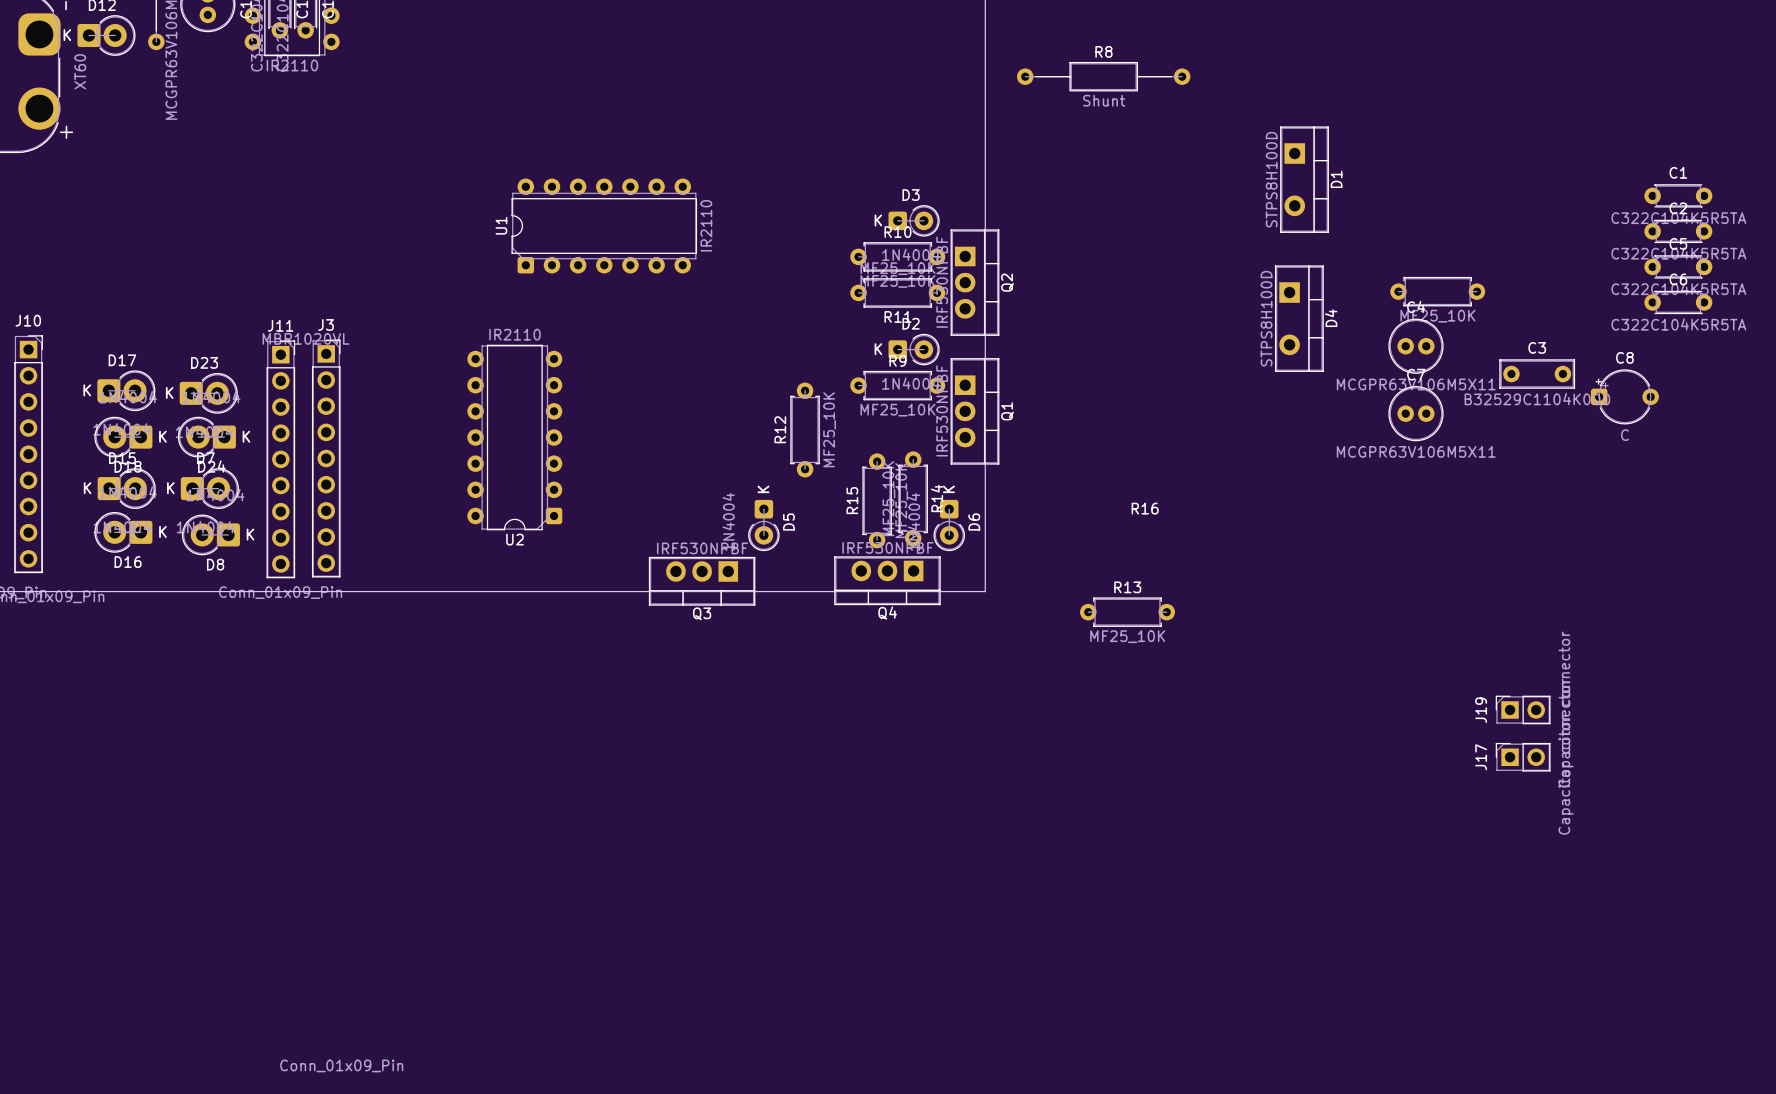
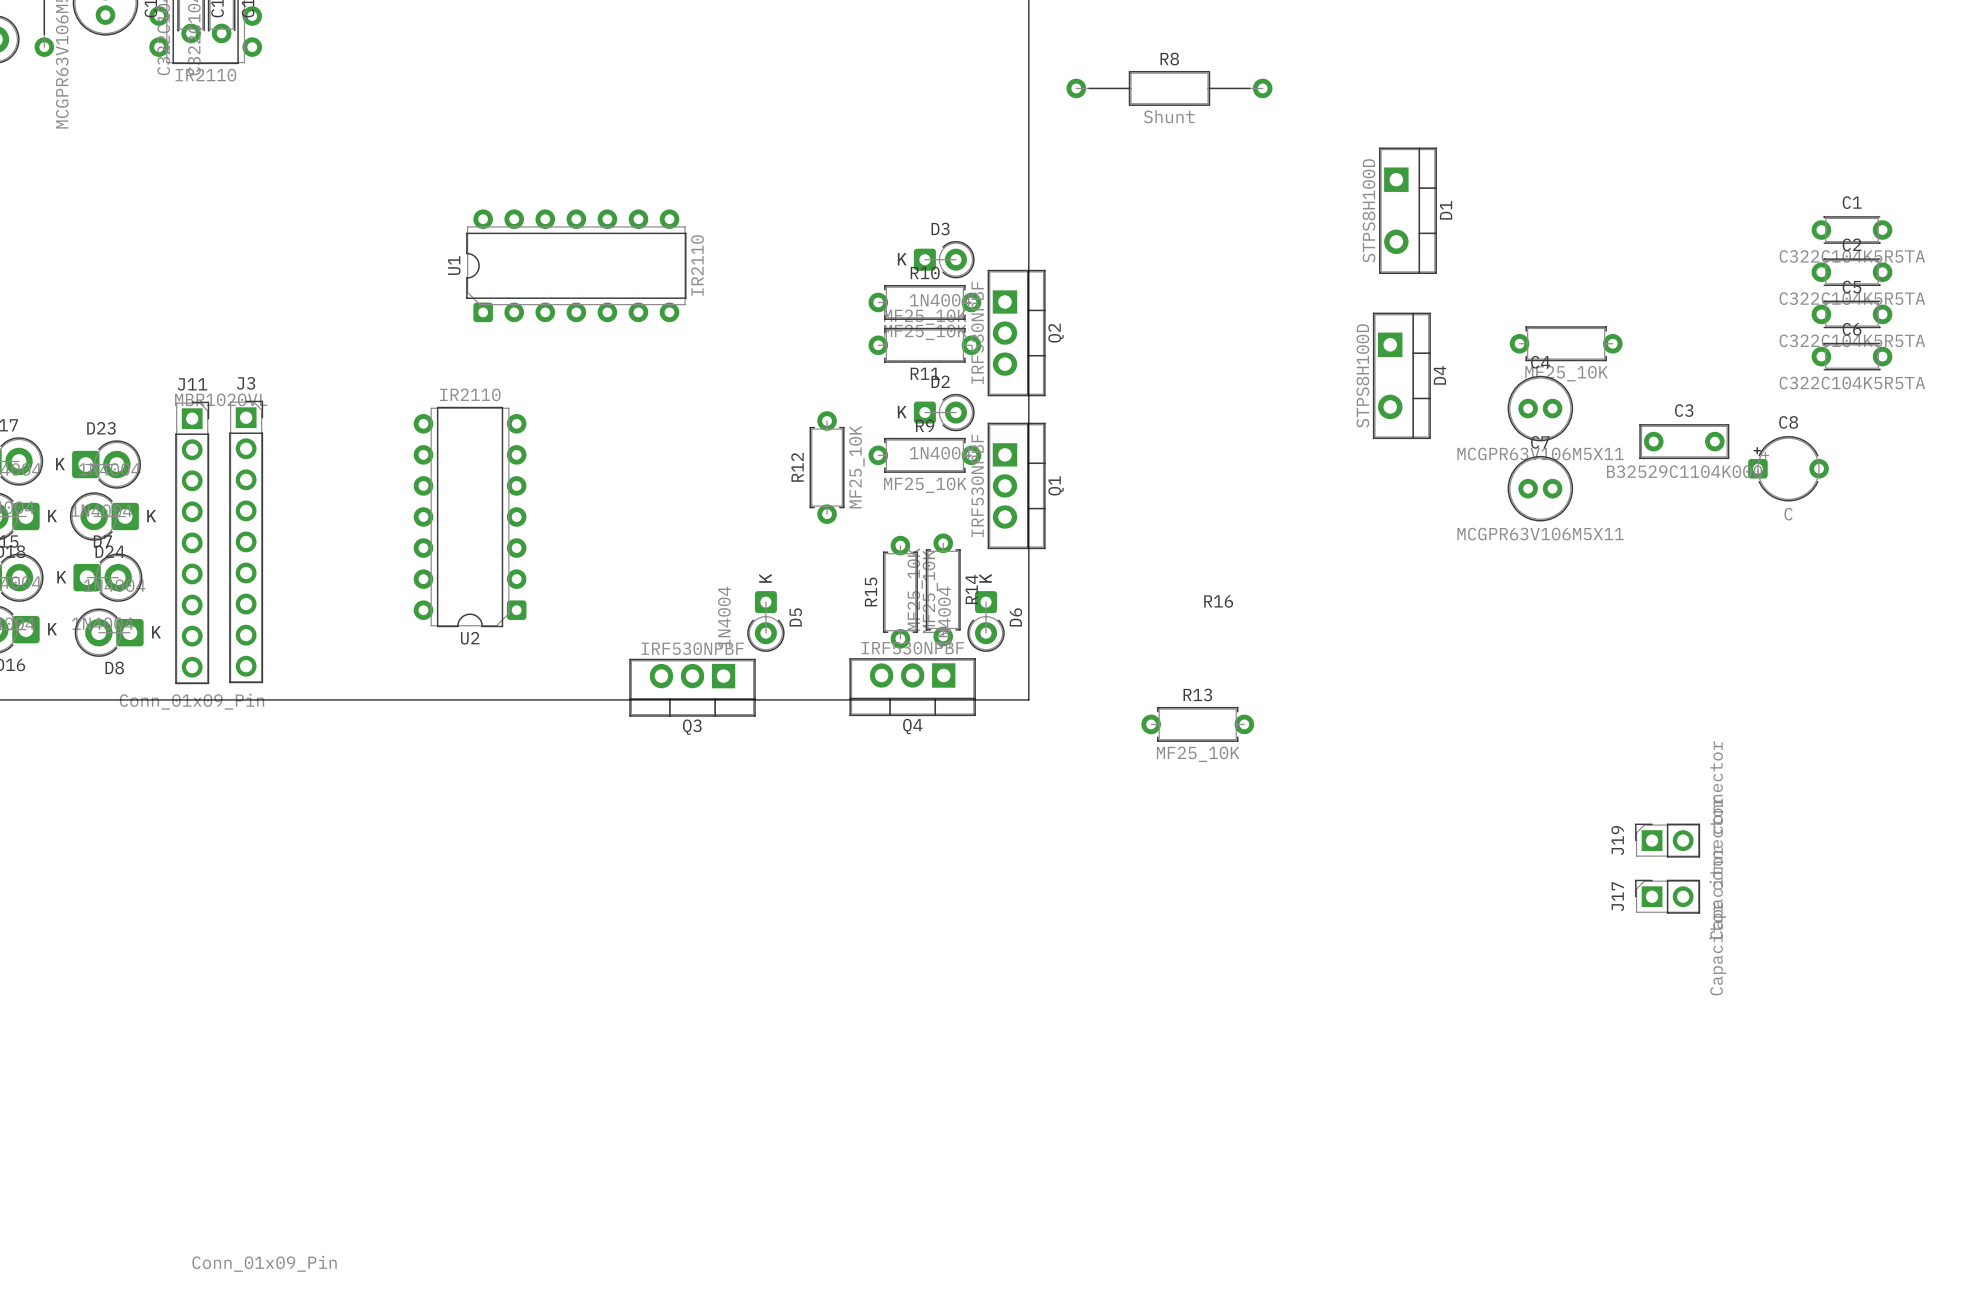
R12 position: (805, 430) -> (827, 467)

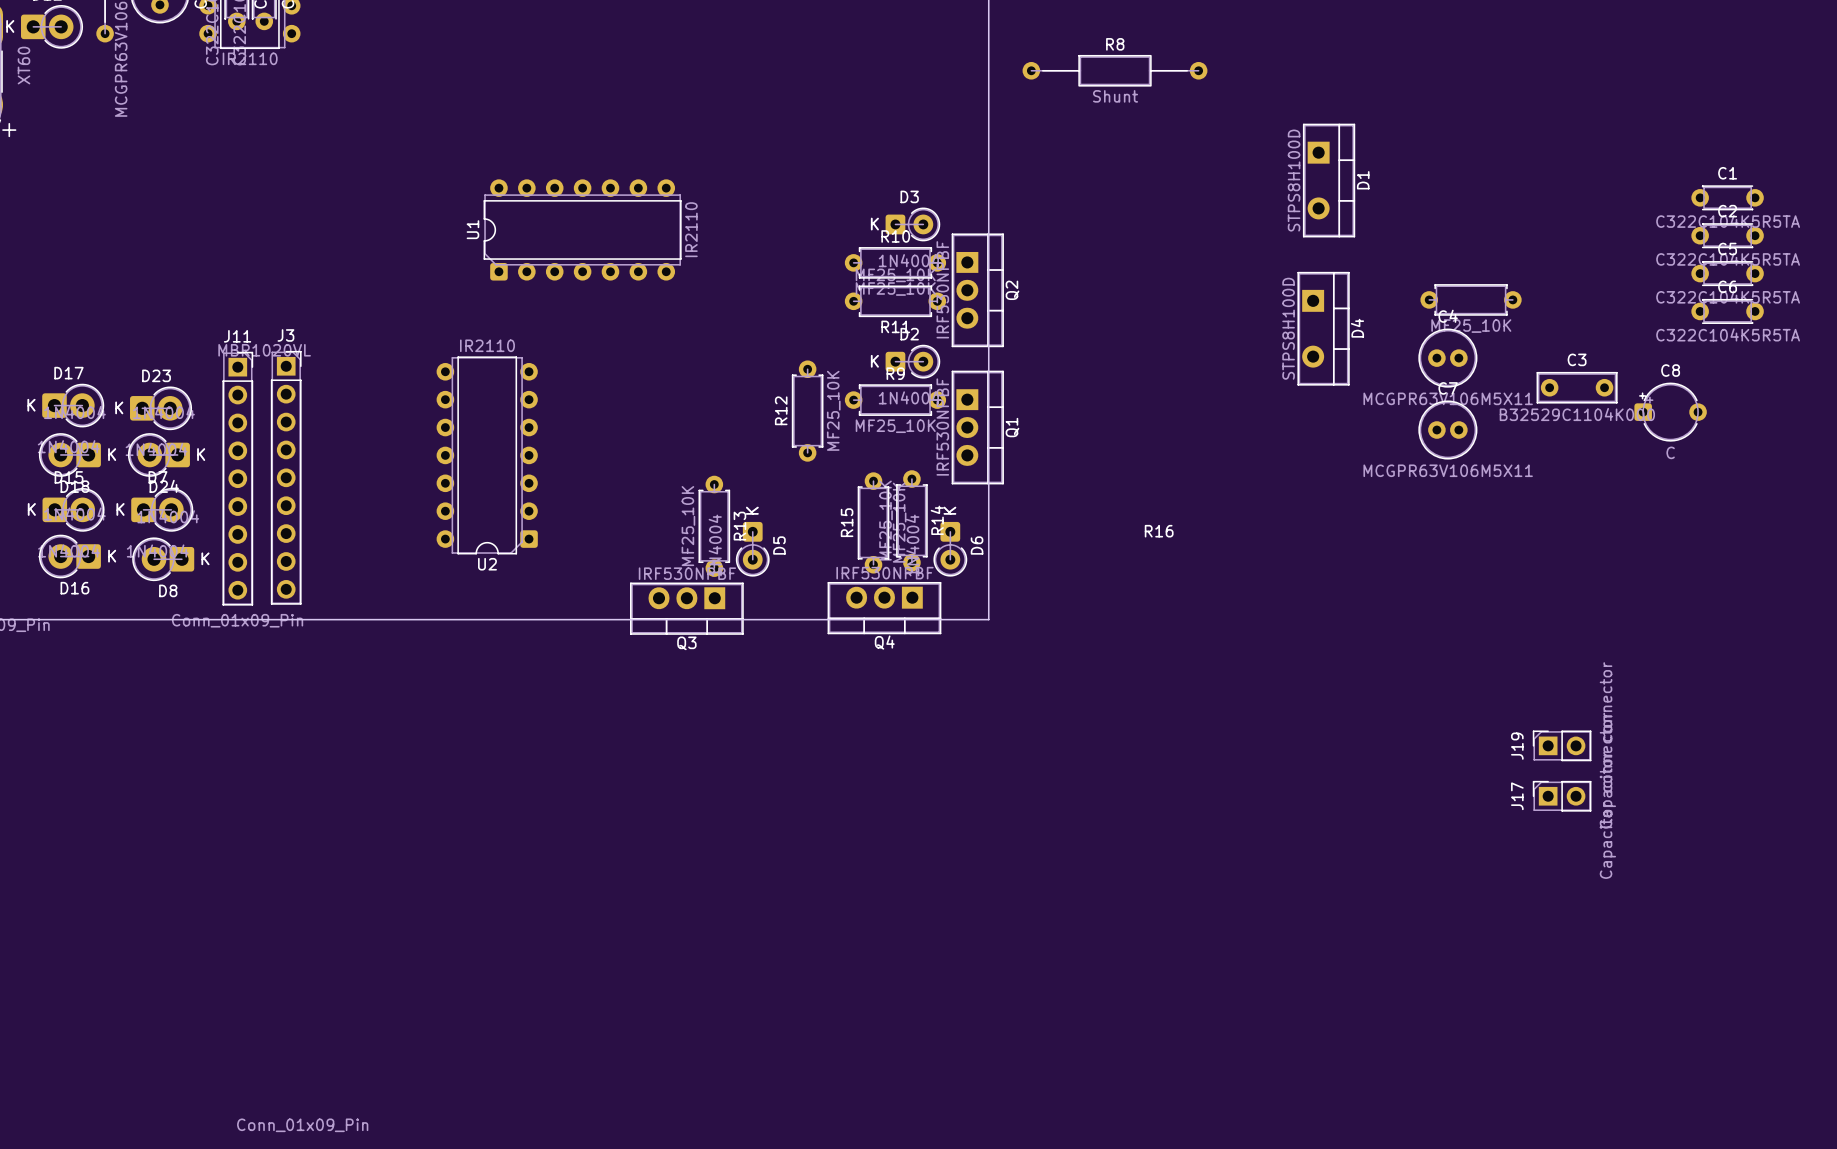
R13 rotation: 0° (1197, 724) -> 90° clockwise (714, 526)
R13 position: (1197, 724) -> (714, 526)

